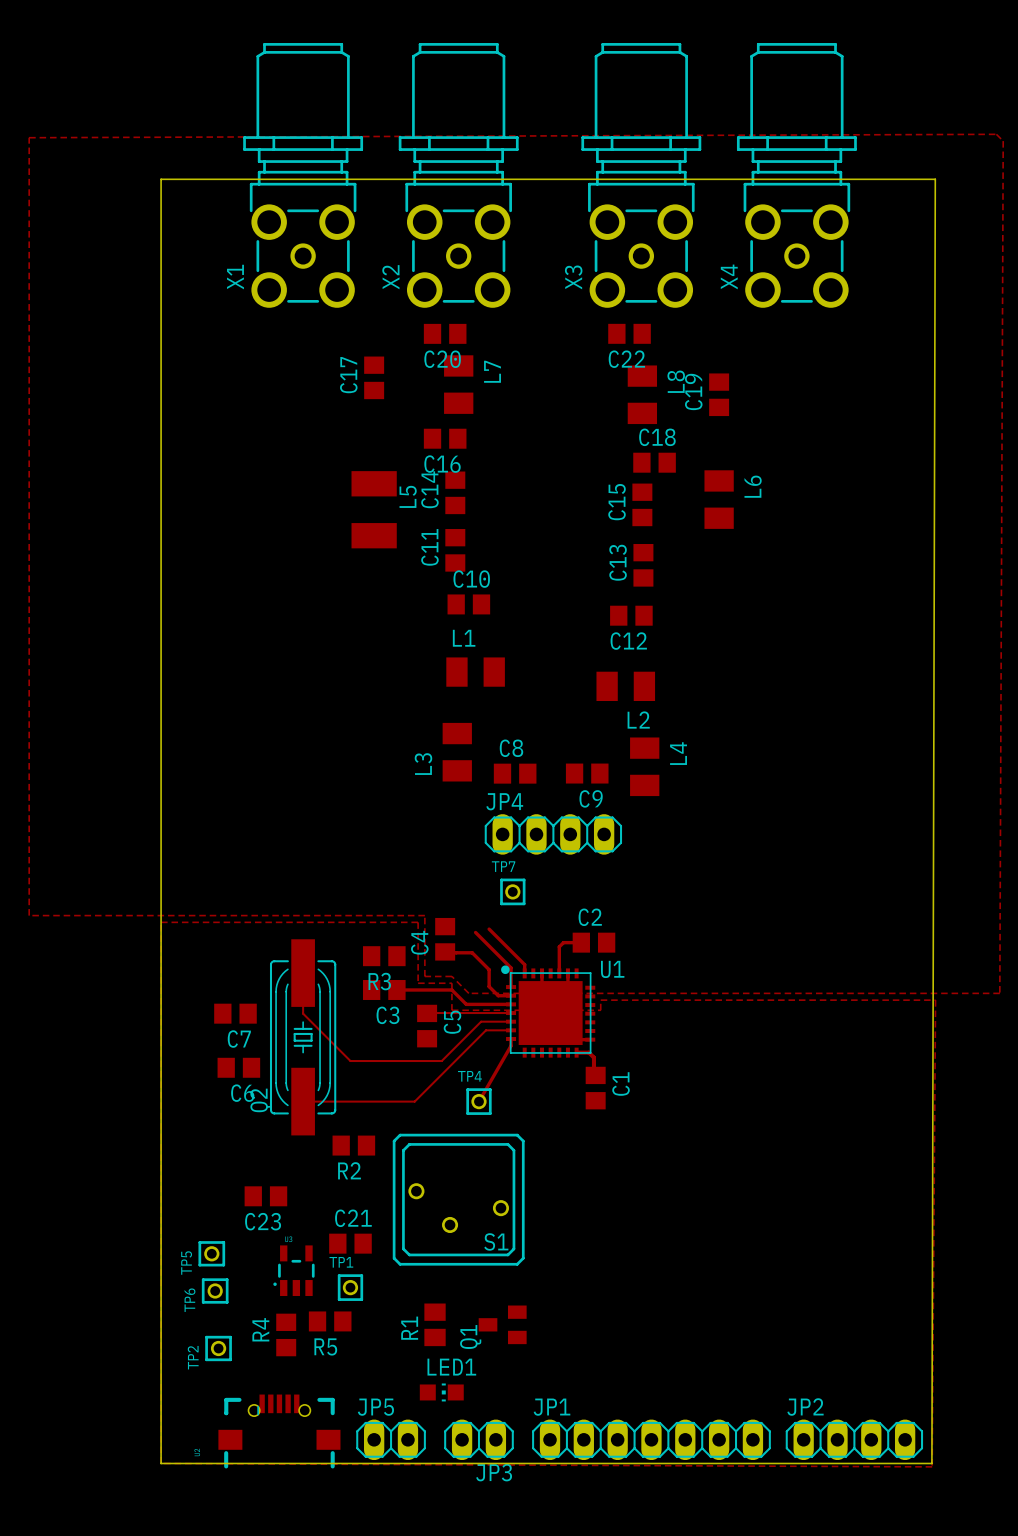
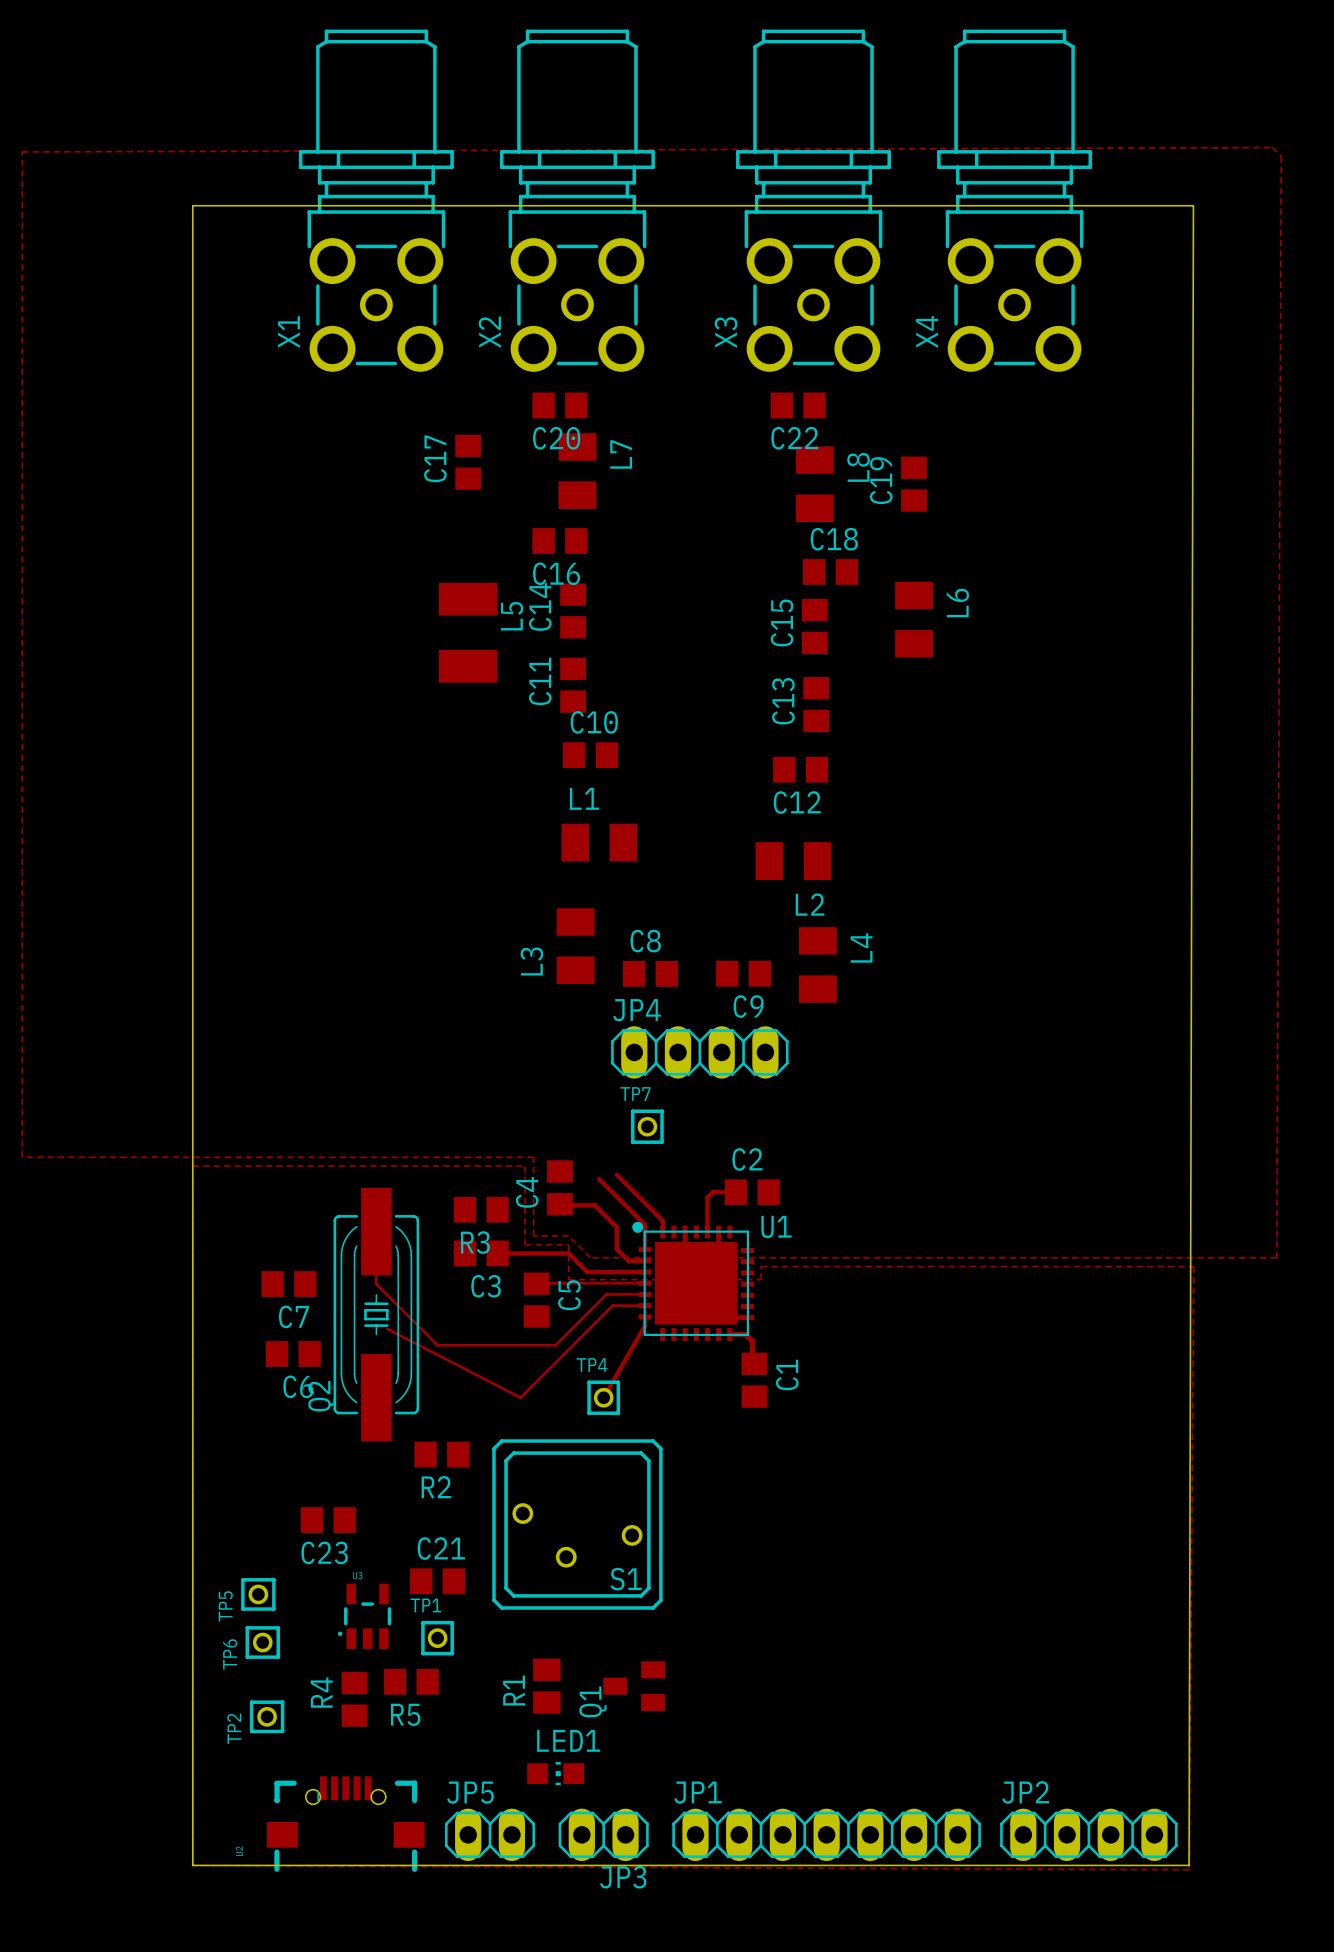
track: (303, 1101) (414, 1101) -> (387, 1328) (520, 1397)

